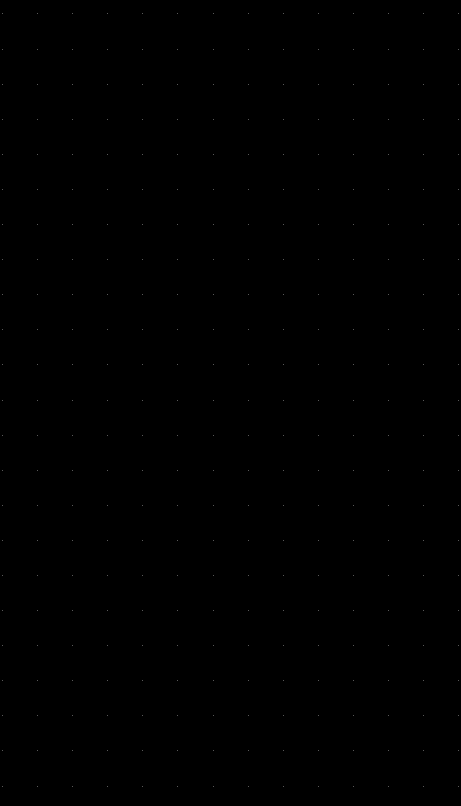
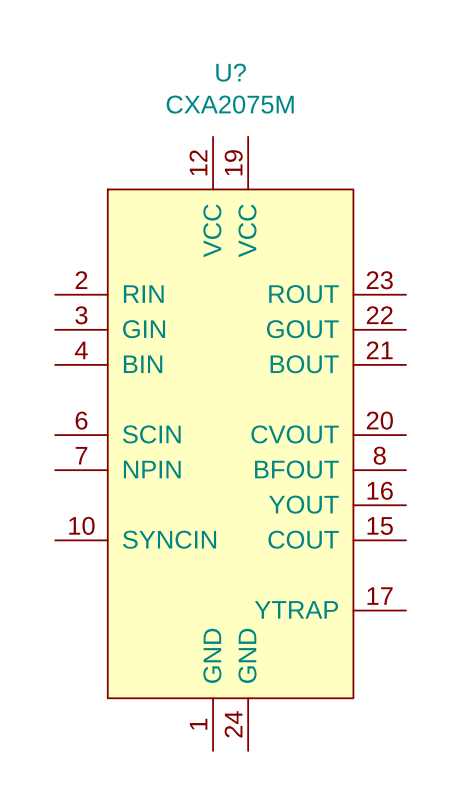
U?: none -> CXA2075M (230, 443)

